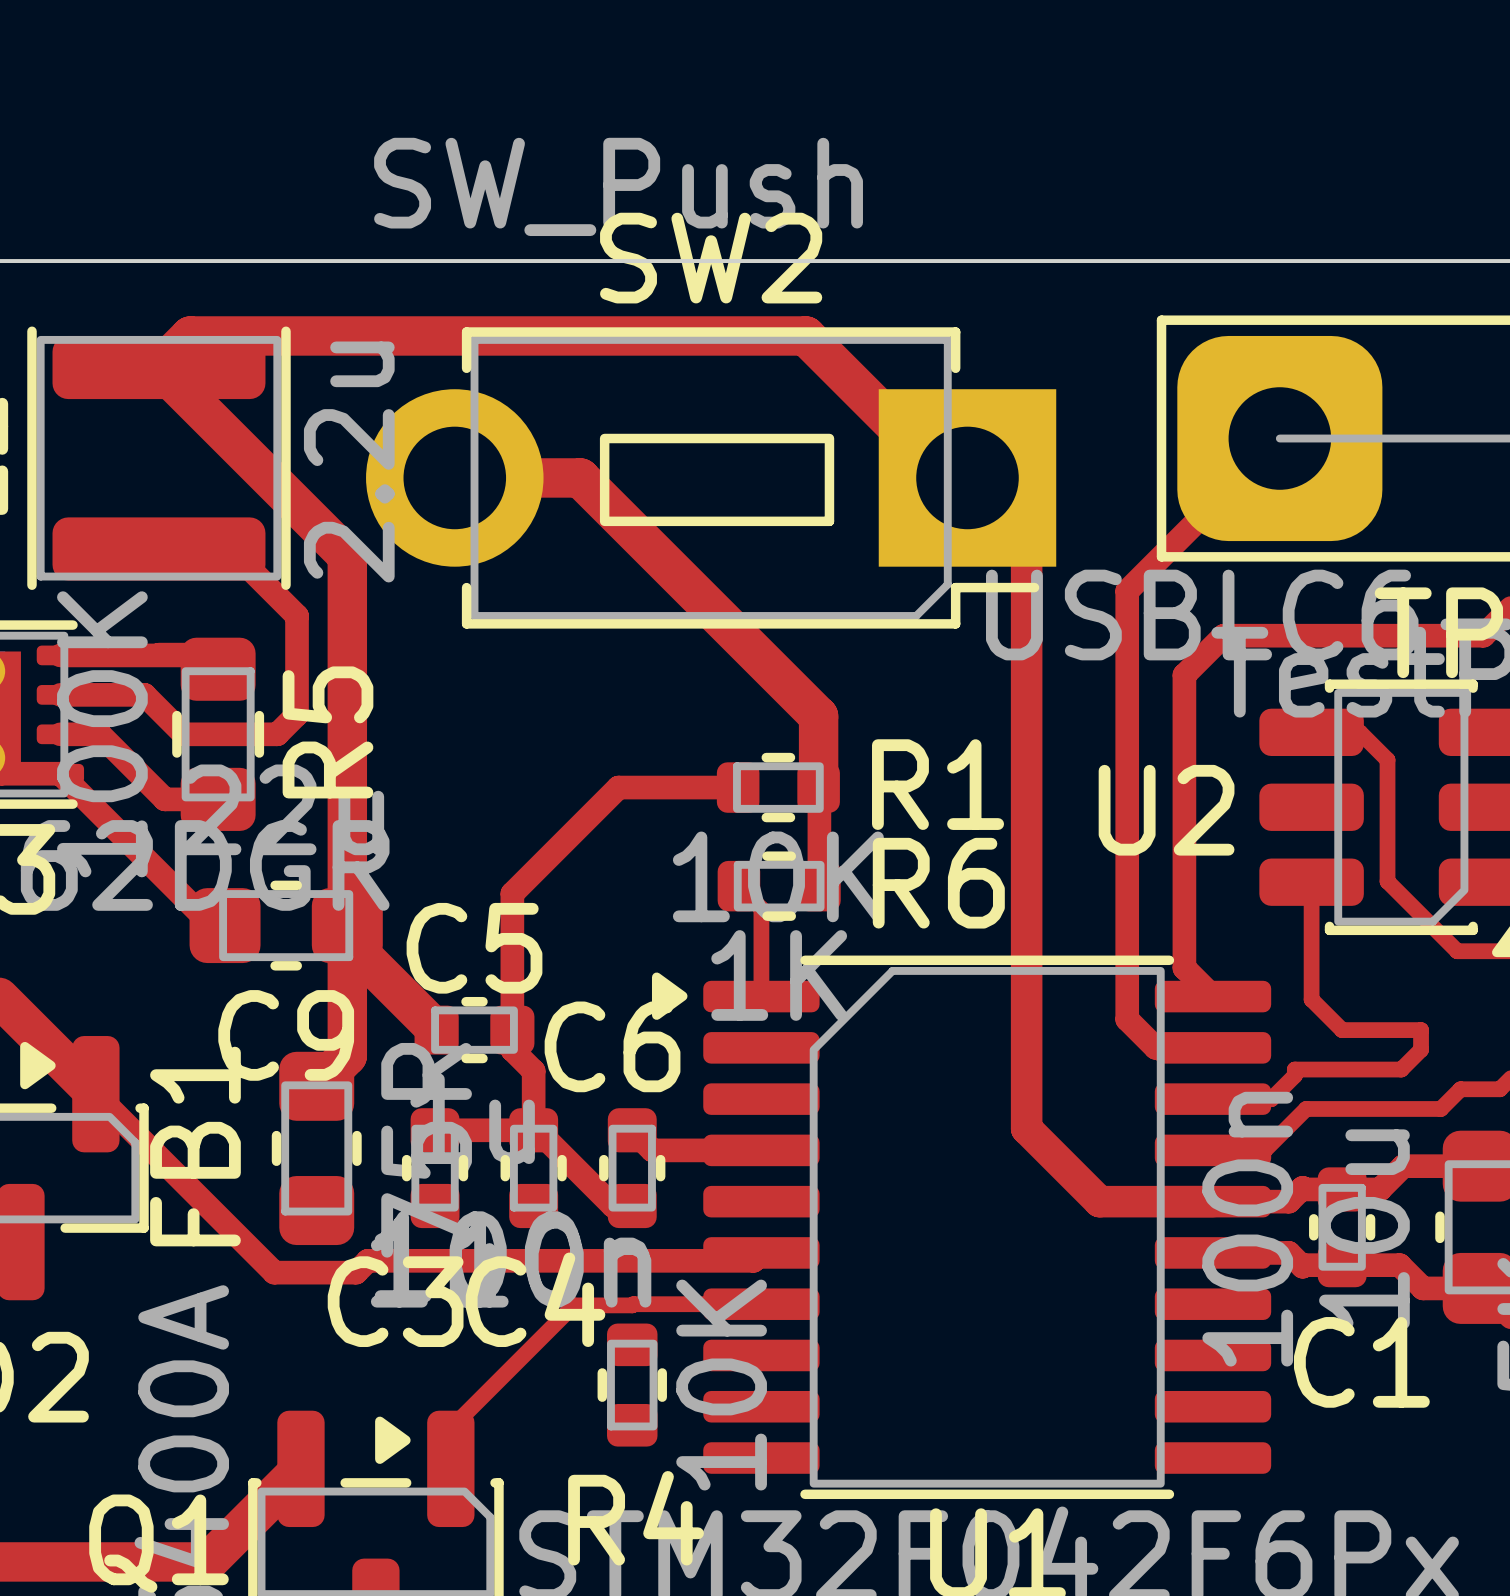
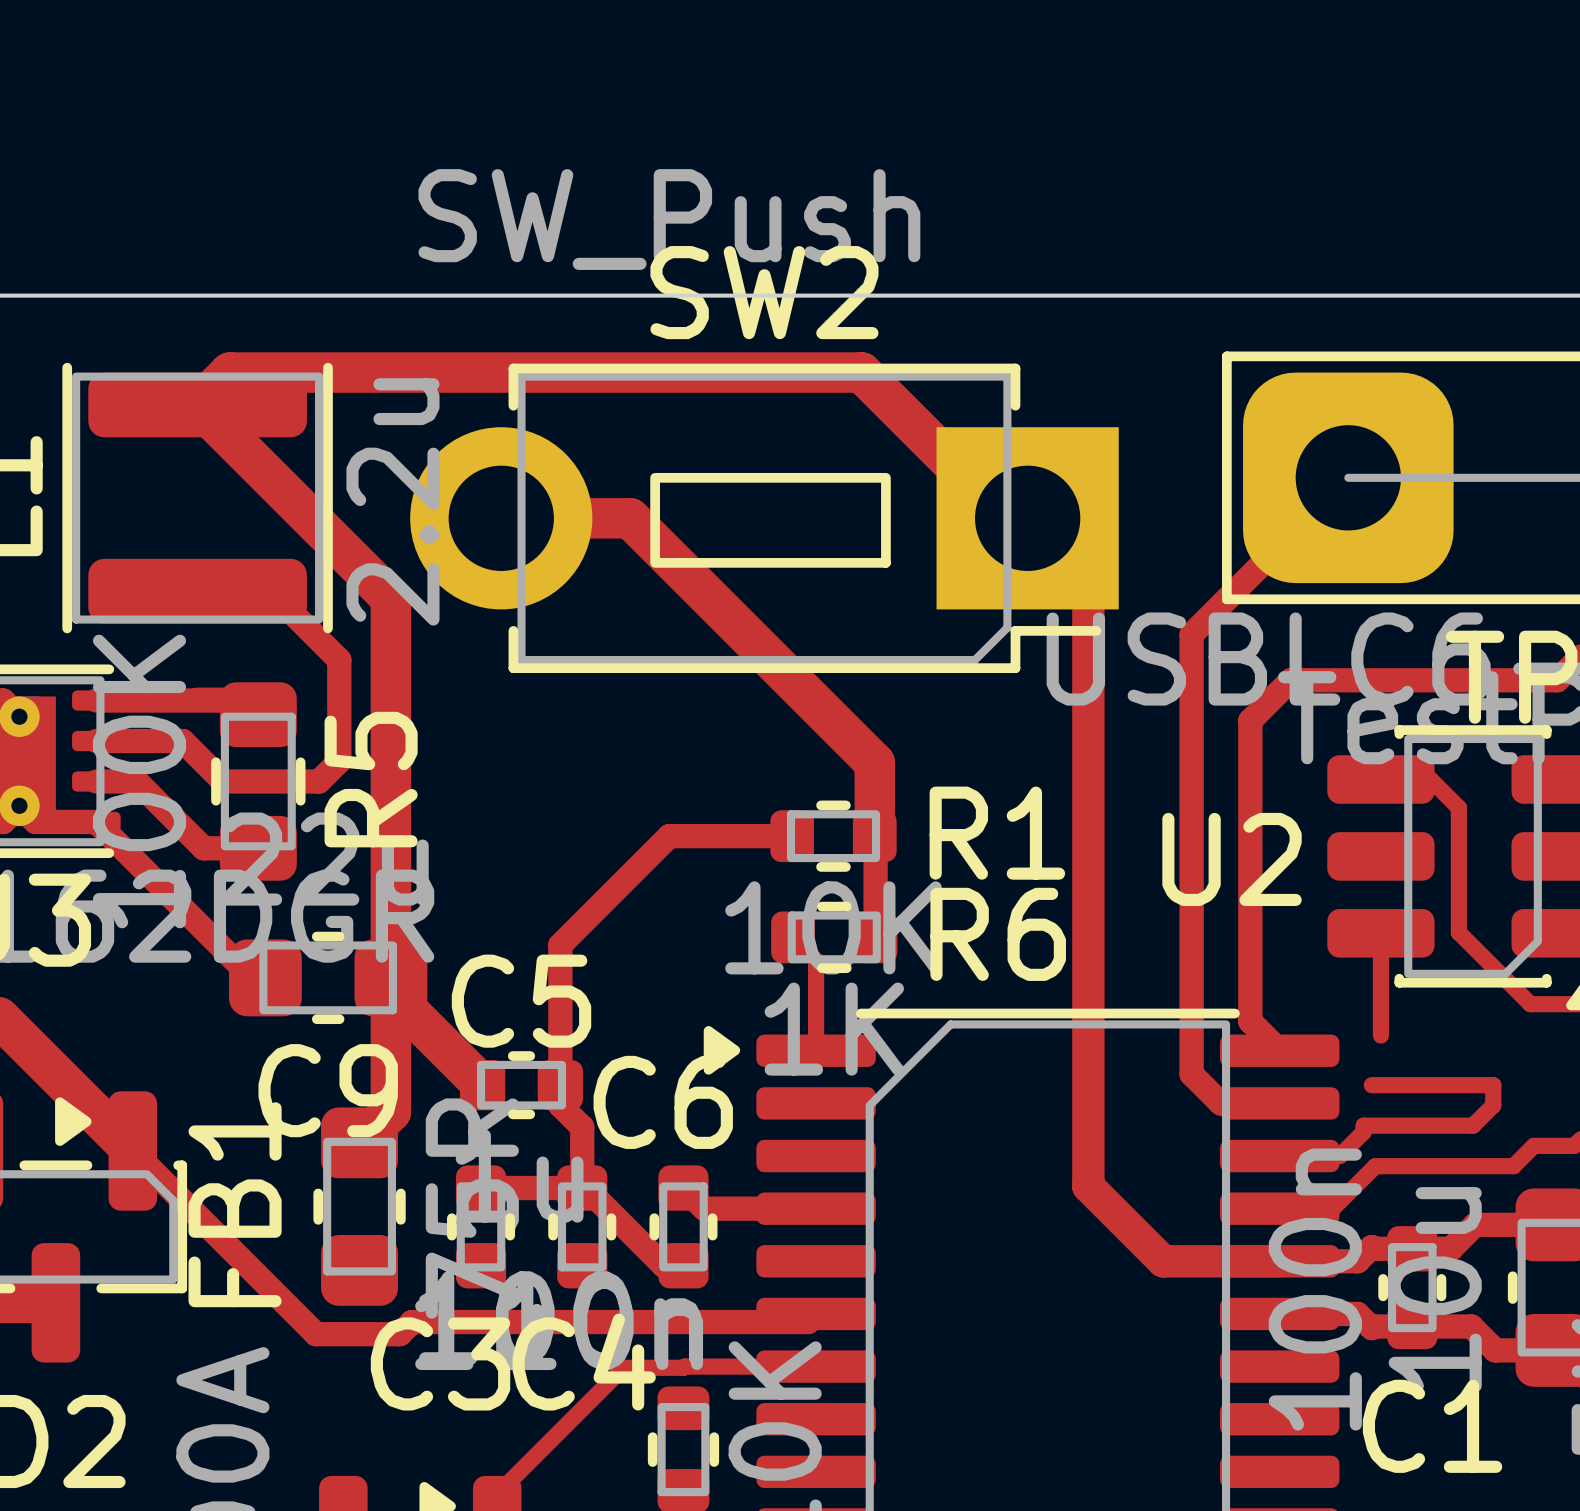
top track: (1311, 981) (1311, 999) (1342, 1030) -> (1371, 1085) (1412, 1085)

